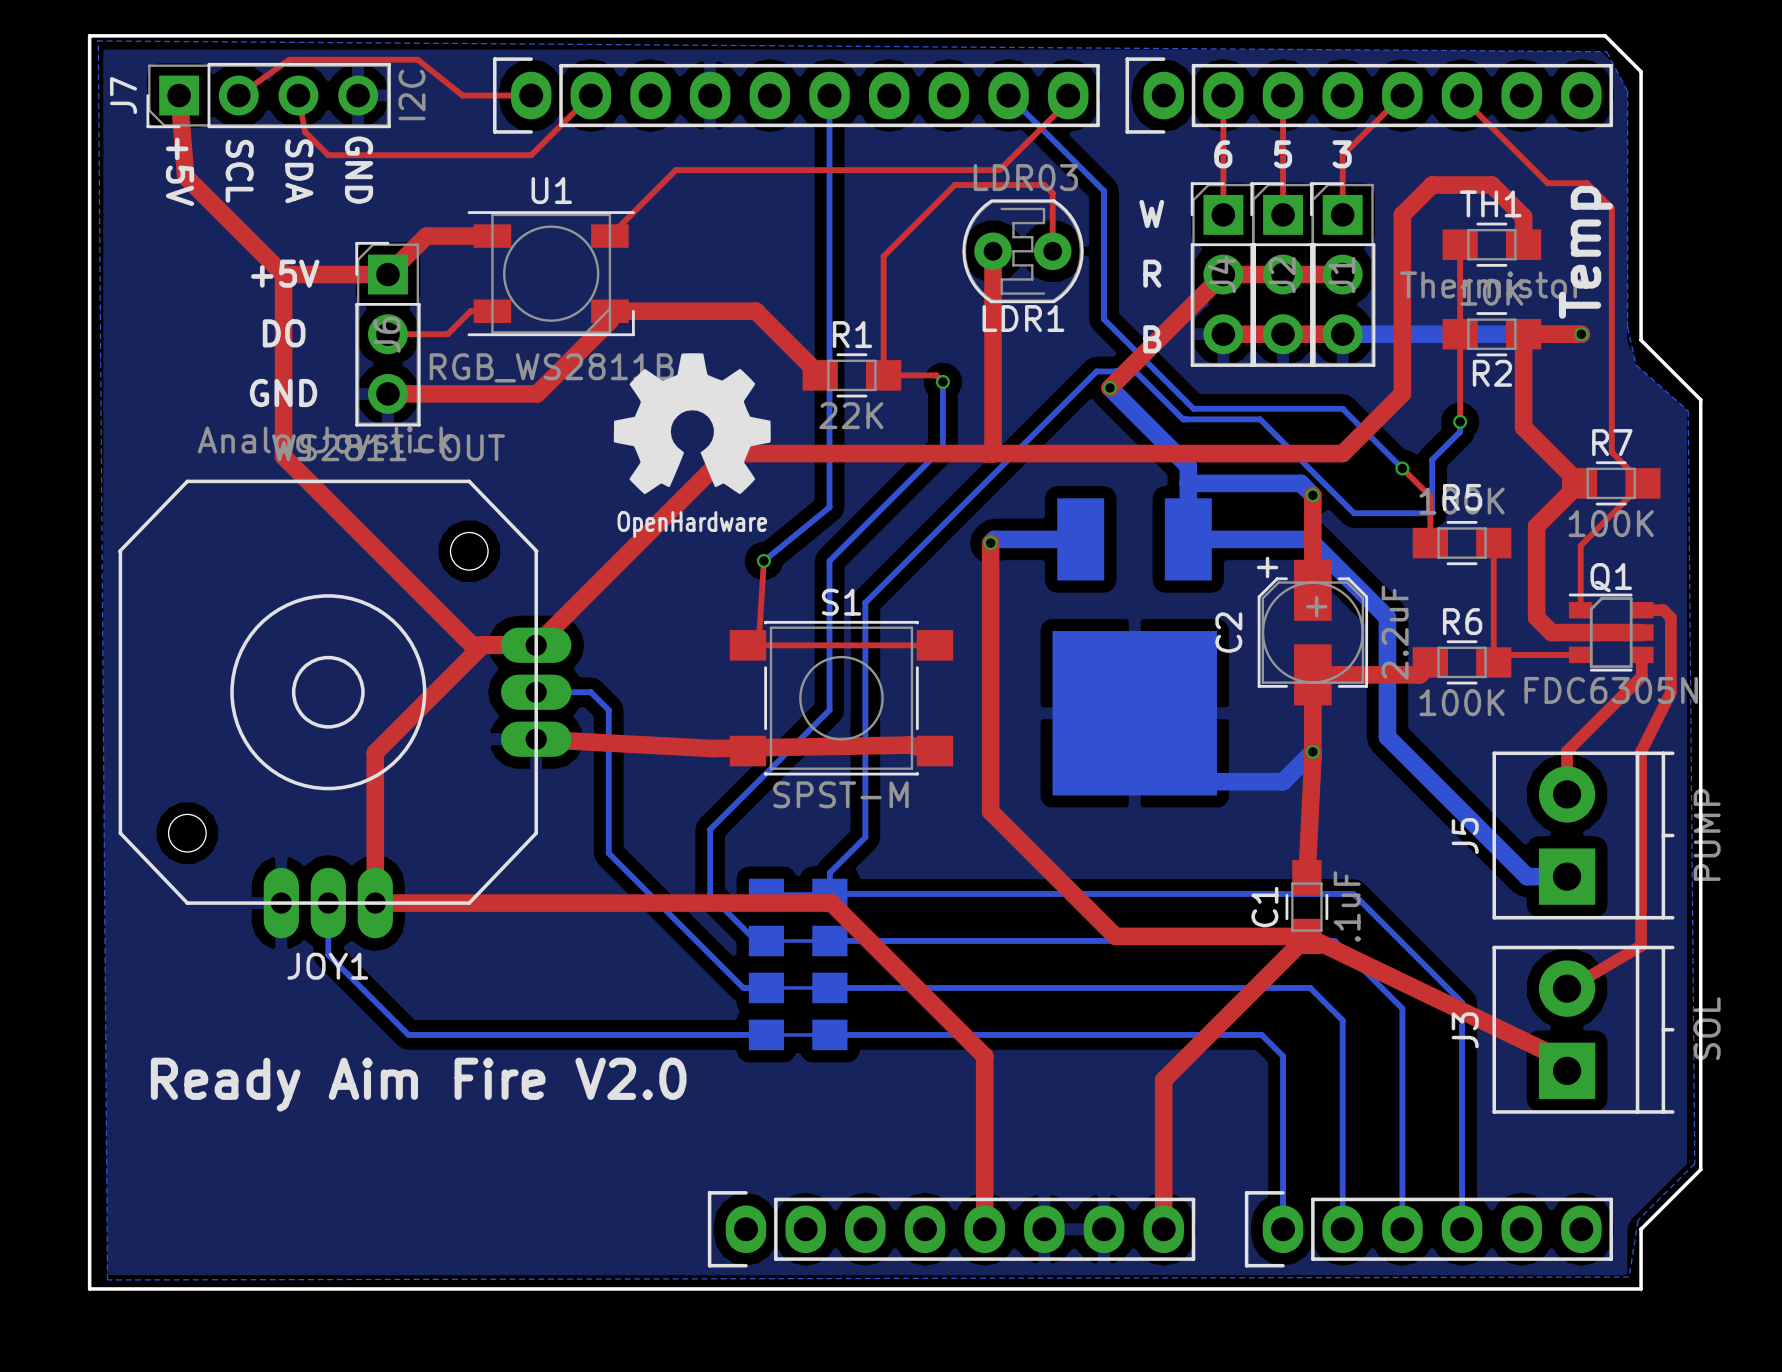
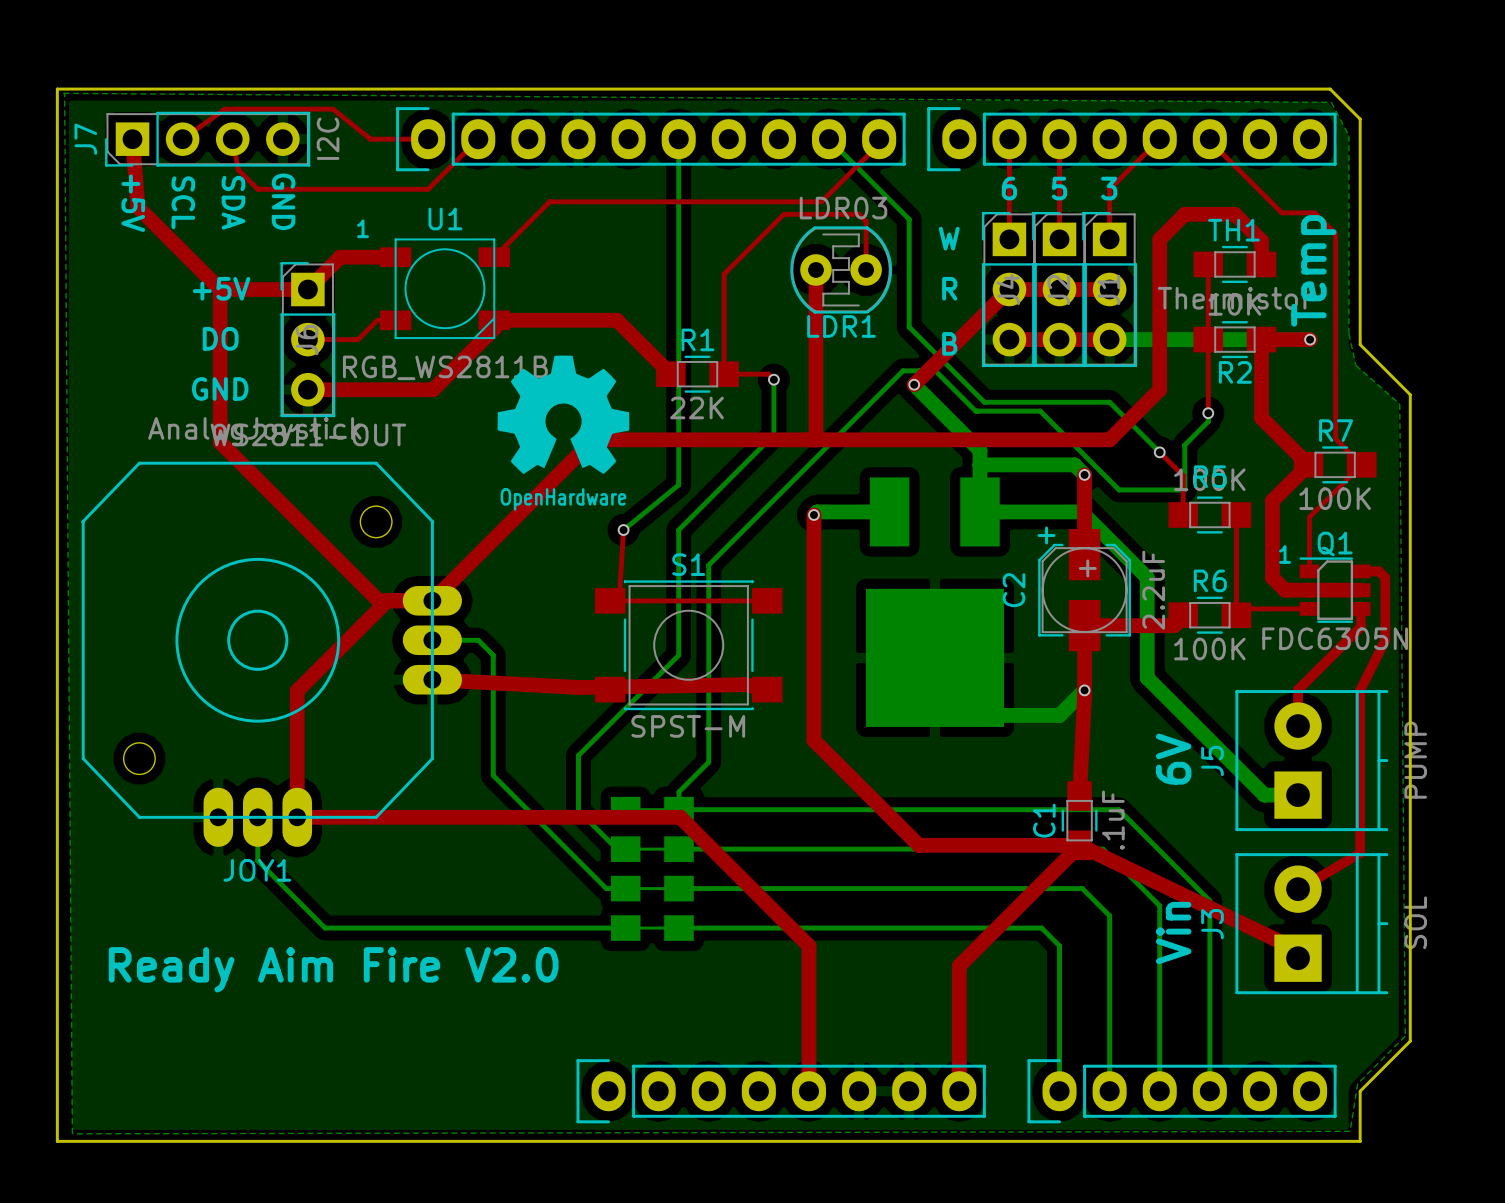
text: none -> 1 (363, 228)
U1 footprint: [467, 211, 635, 337] -> [379, 238, 511, 340]
text: none -> 1 (1285, 554)
text: none -> 6V (1173, 759)
text: none -> Vin (1173, 933)

